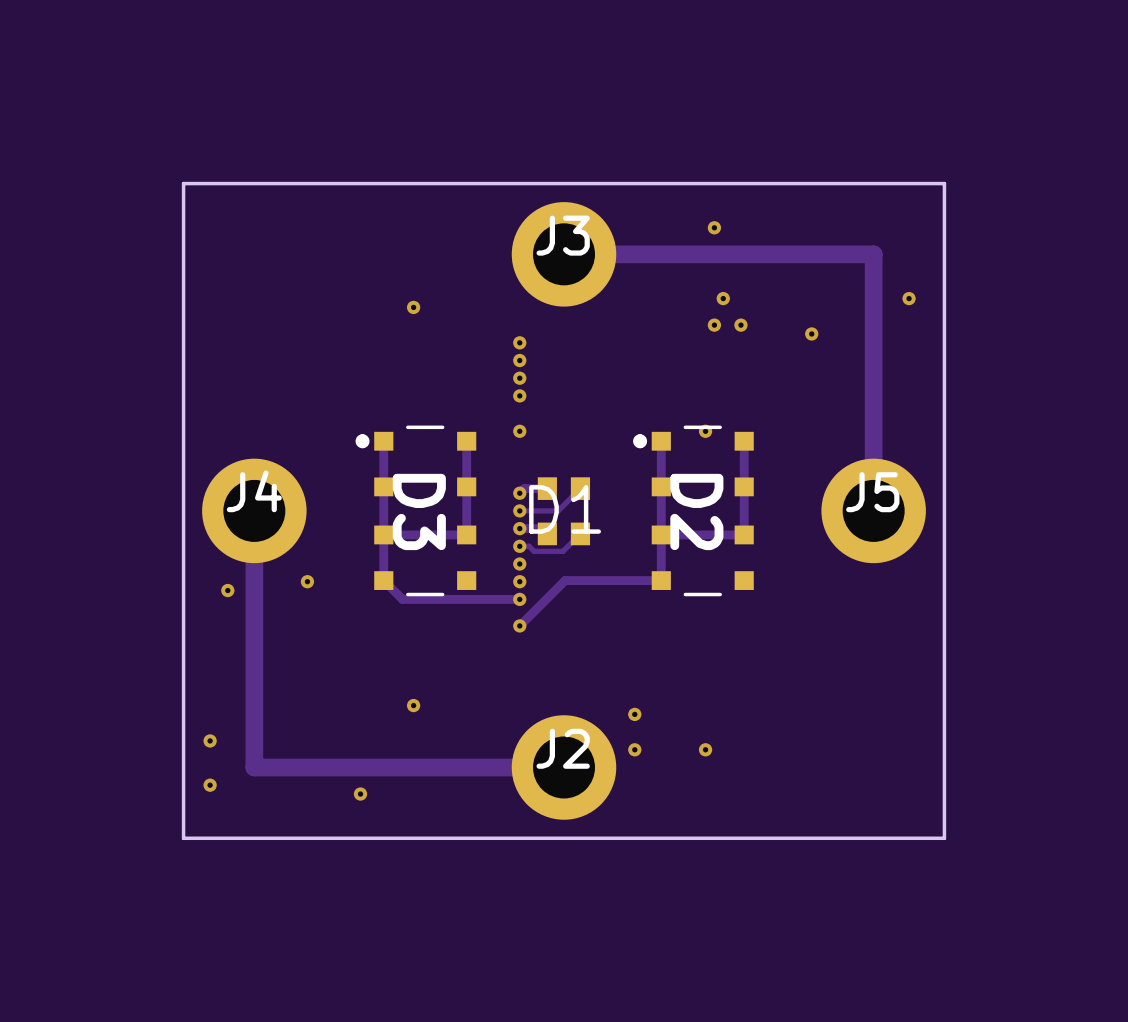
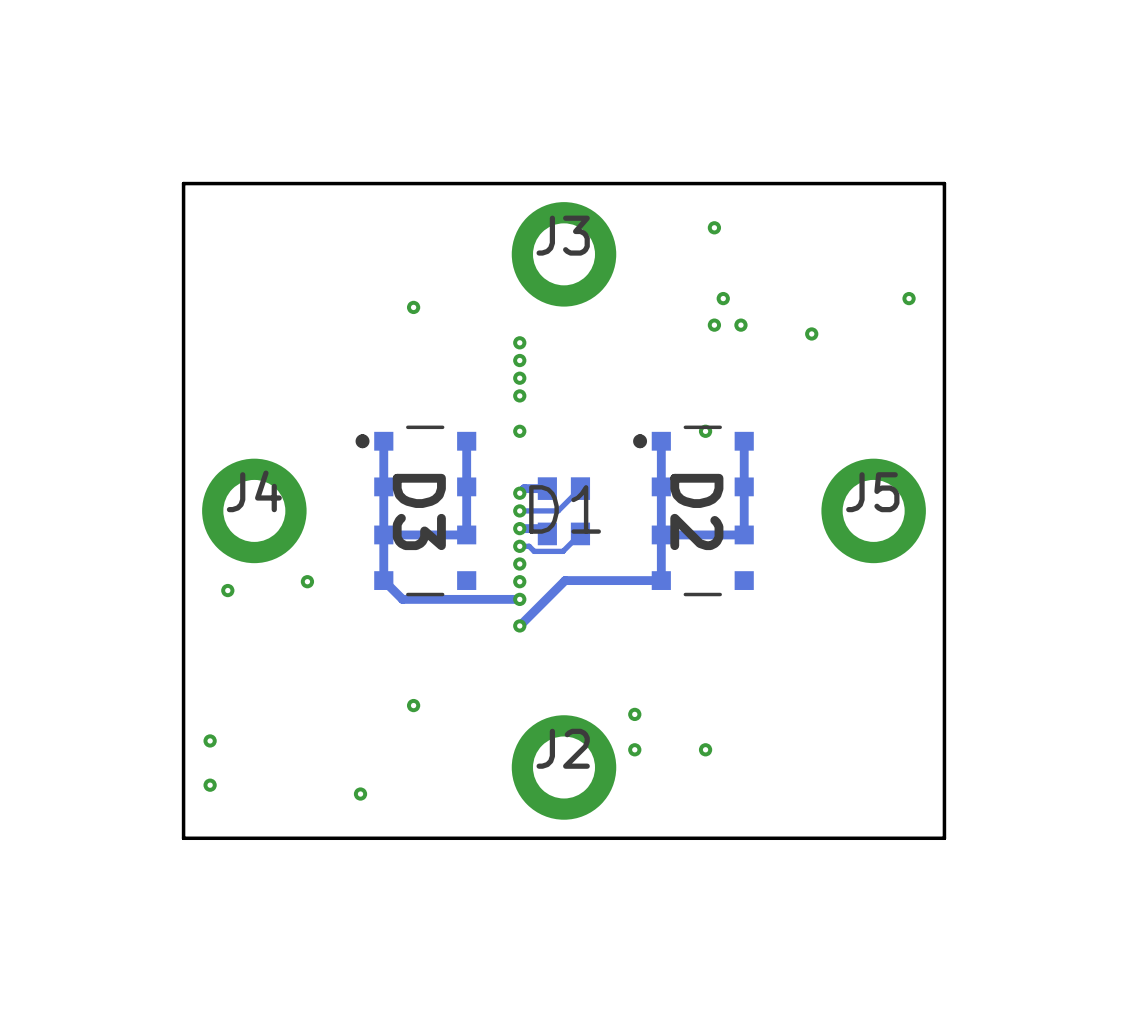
track: (564, 254) (873, 254) (873, 510) -> none
track: (254, 510) (254, 767) (564, 767) -> none

